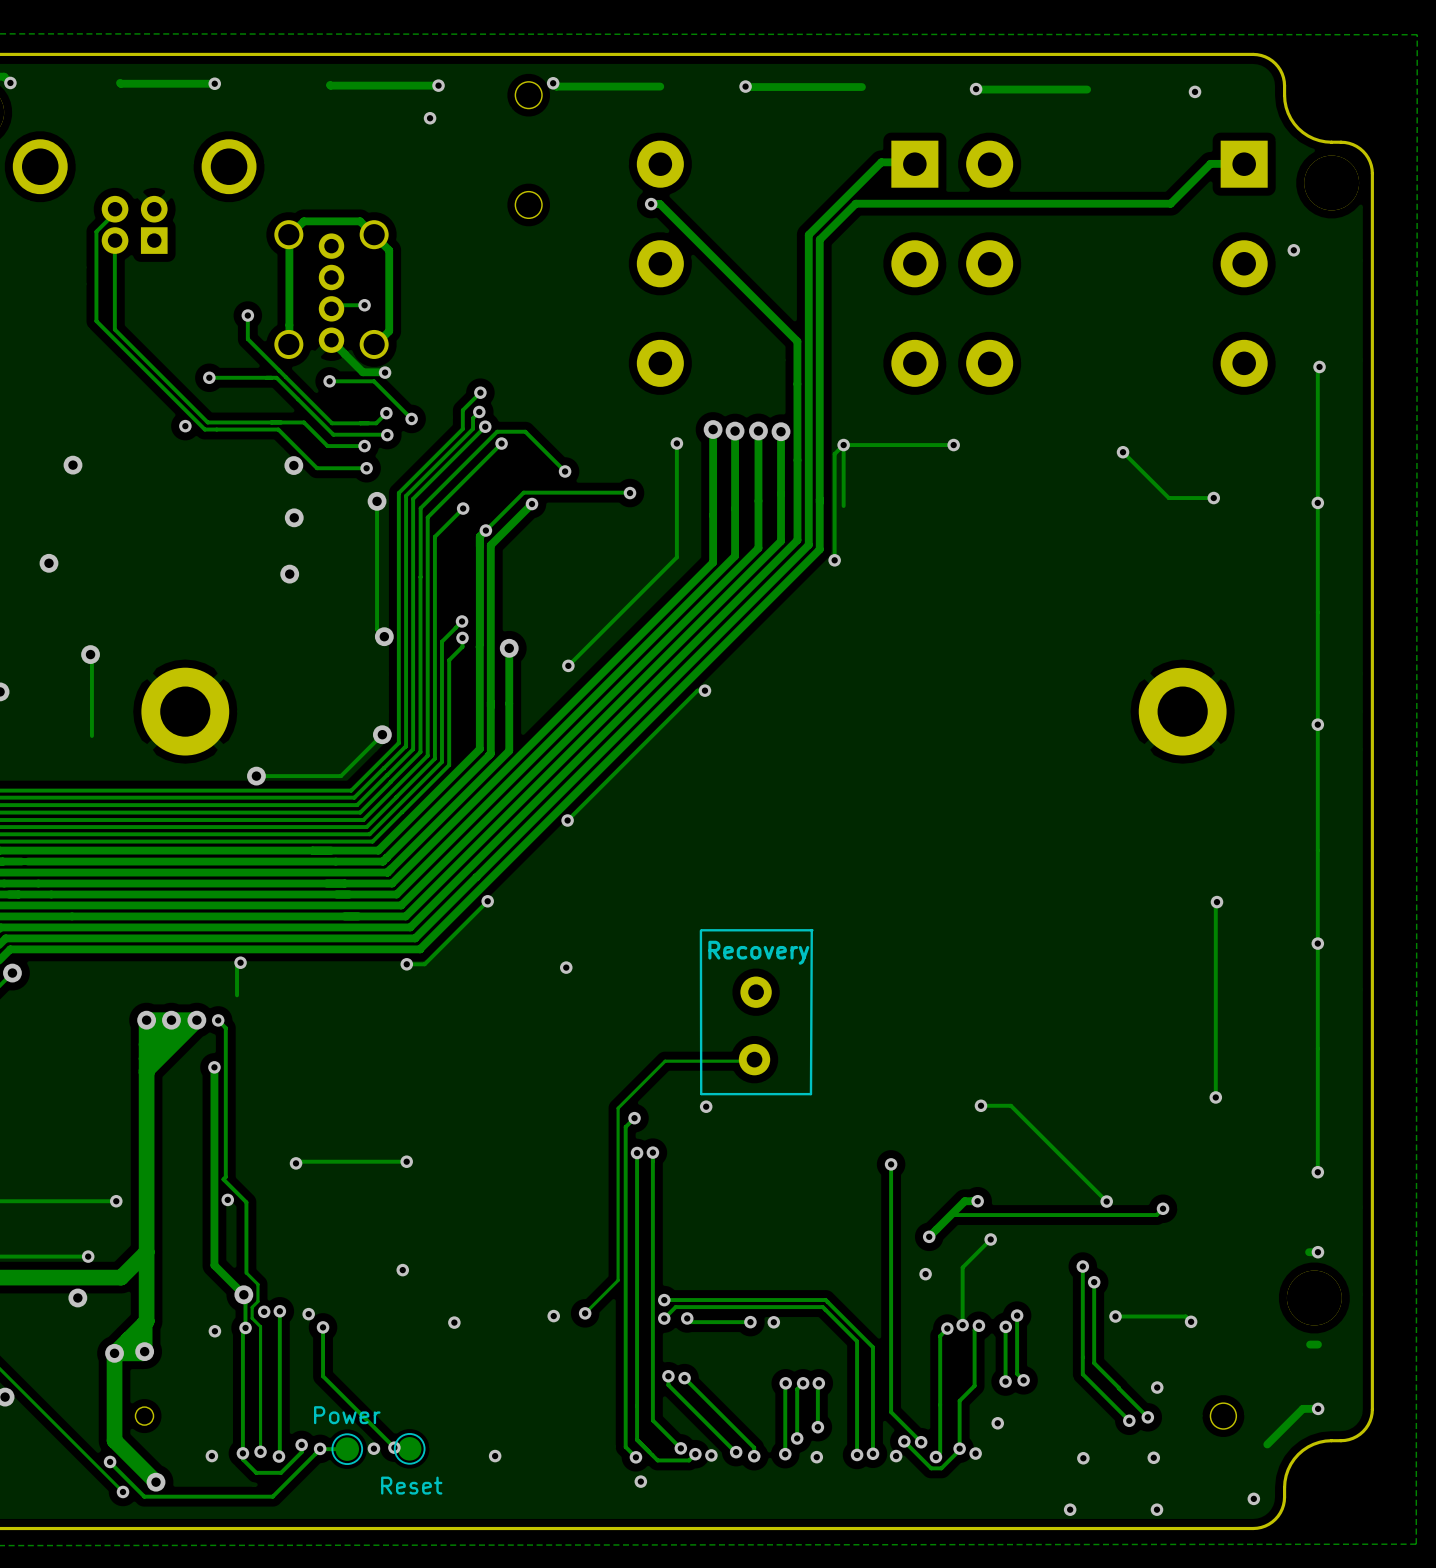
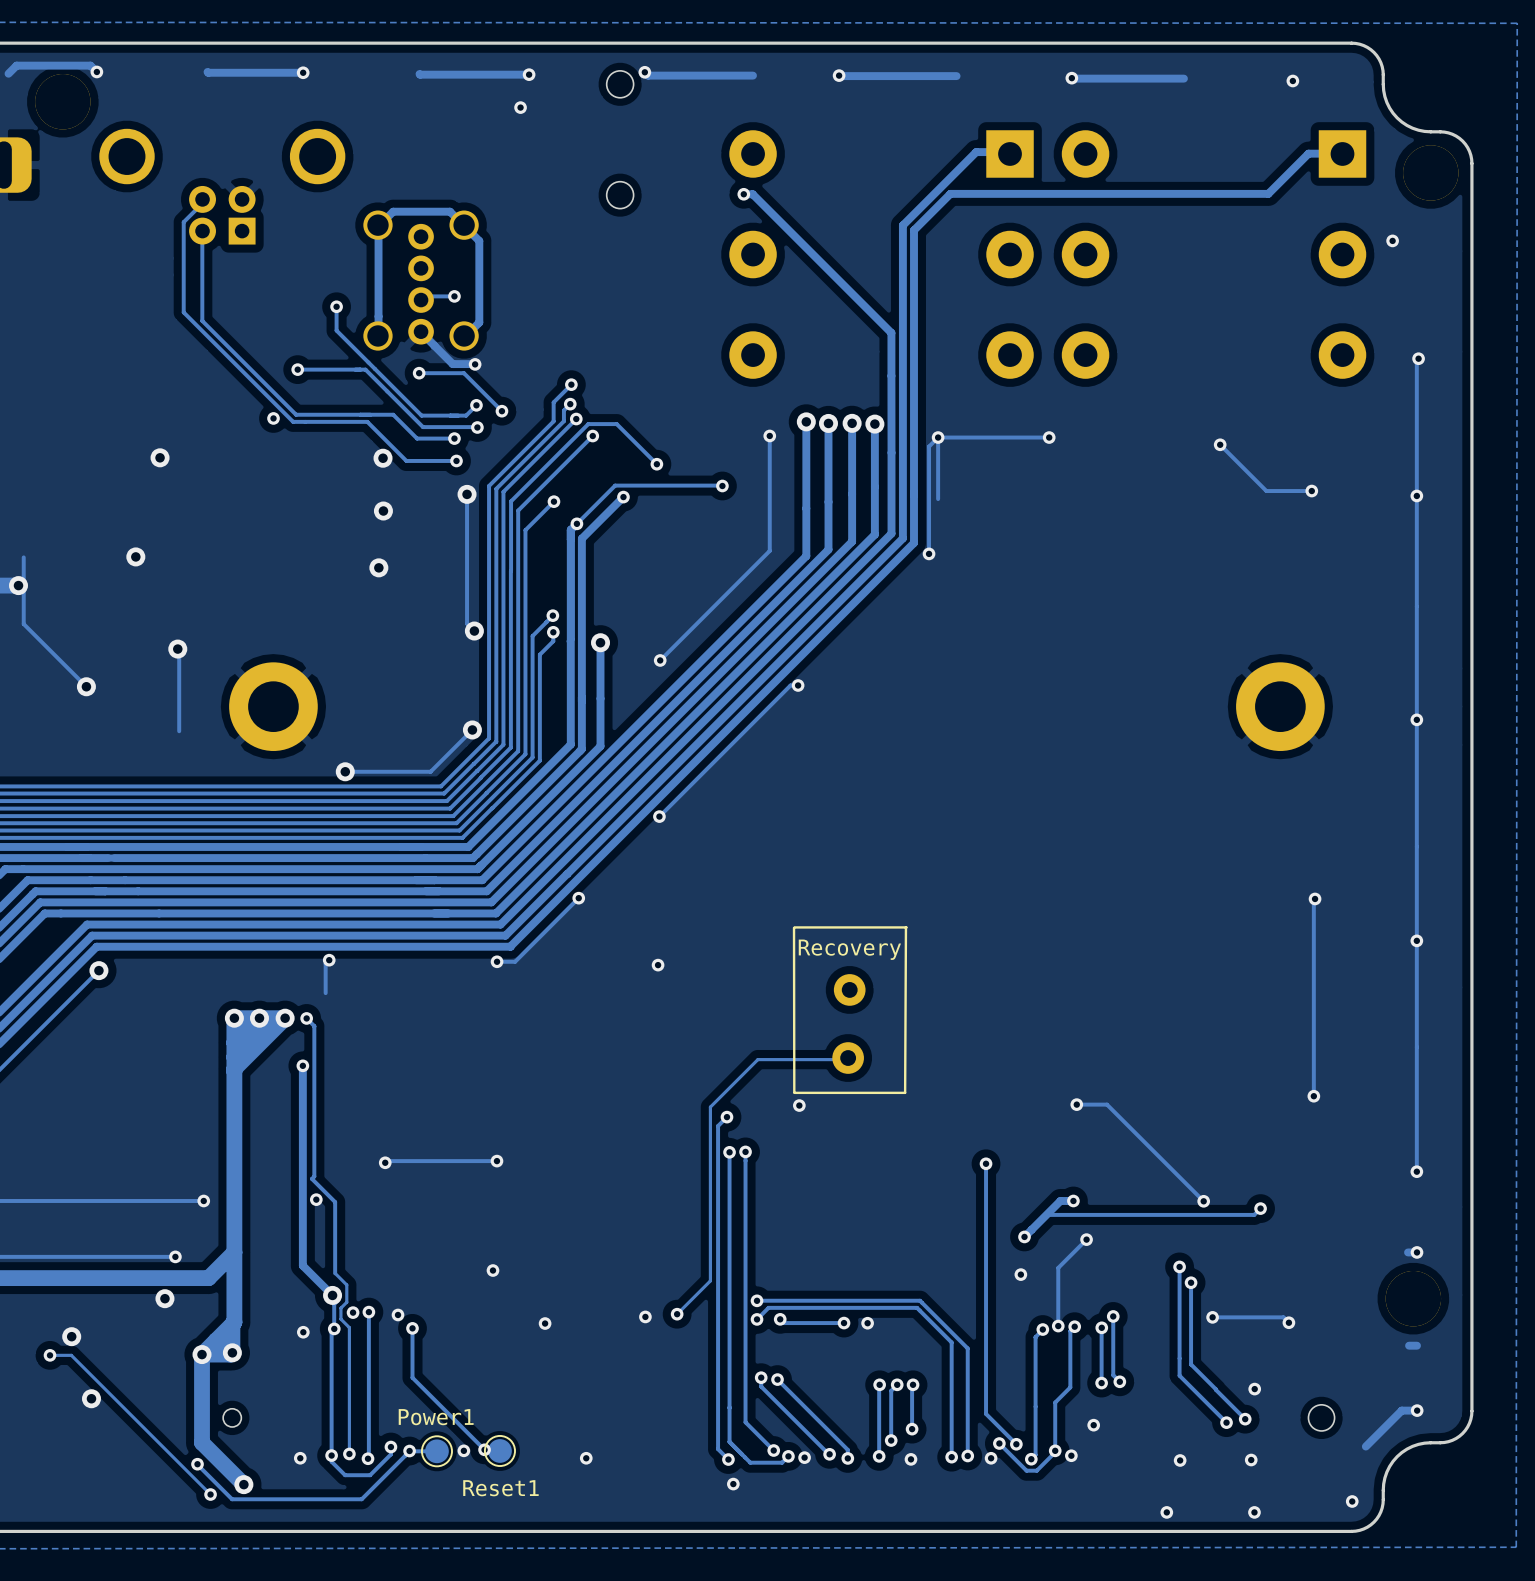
Power name: Power (347, 1415) -> Power1 (436, 1417)
Reset name: Reset (411, 1485) -> Reset1 (500, 1488)

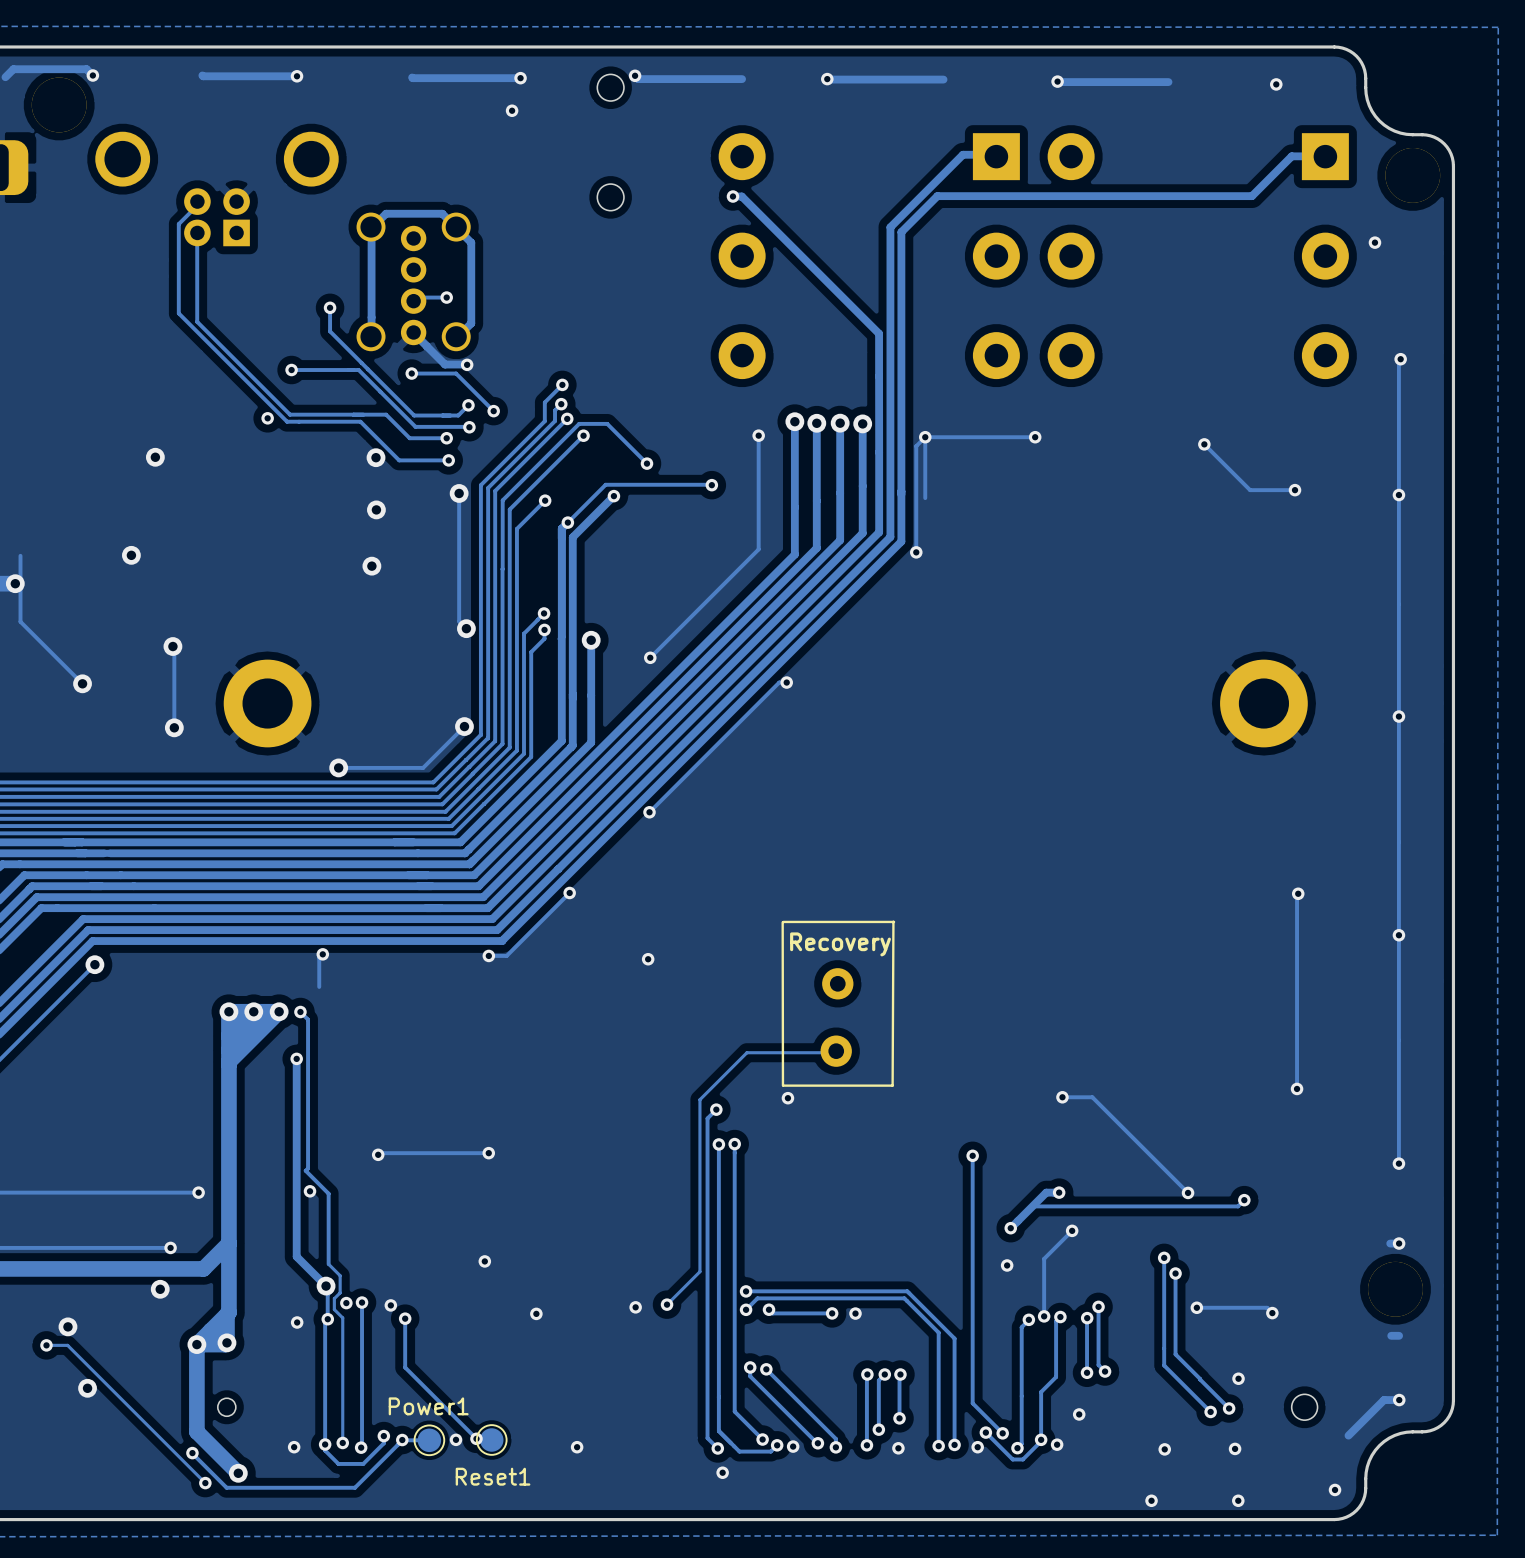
via: none -> (174, 727)

